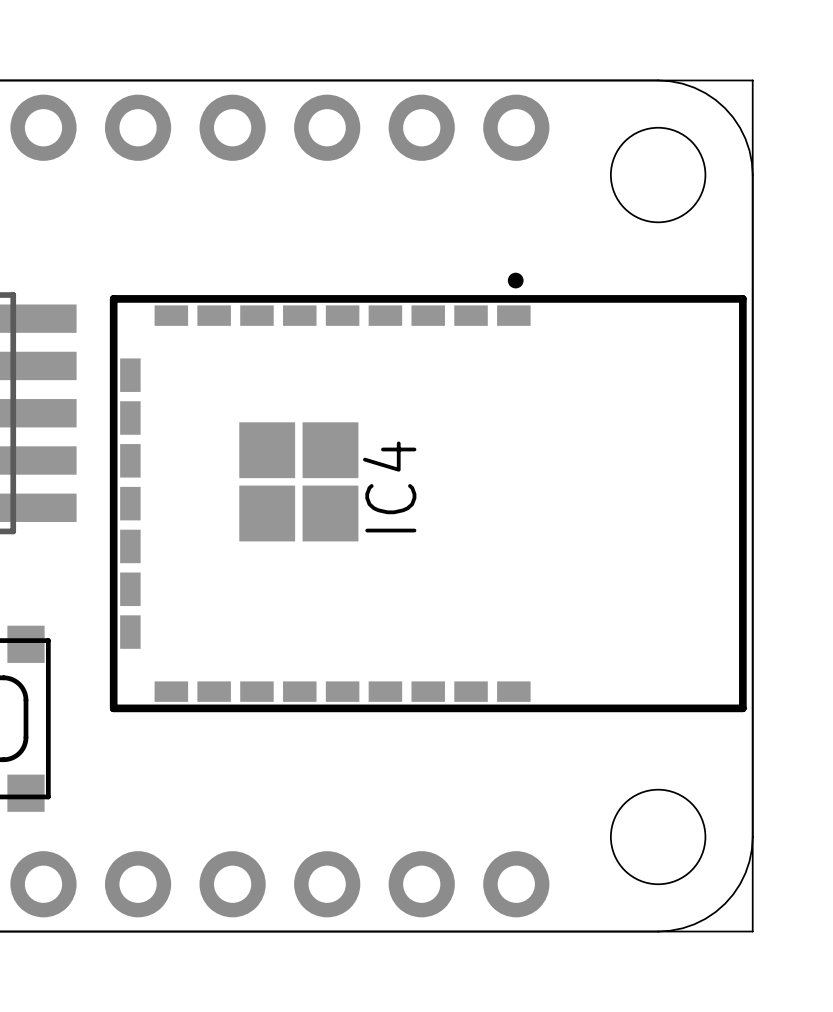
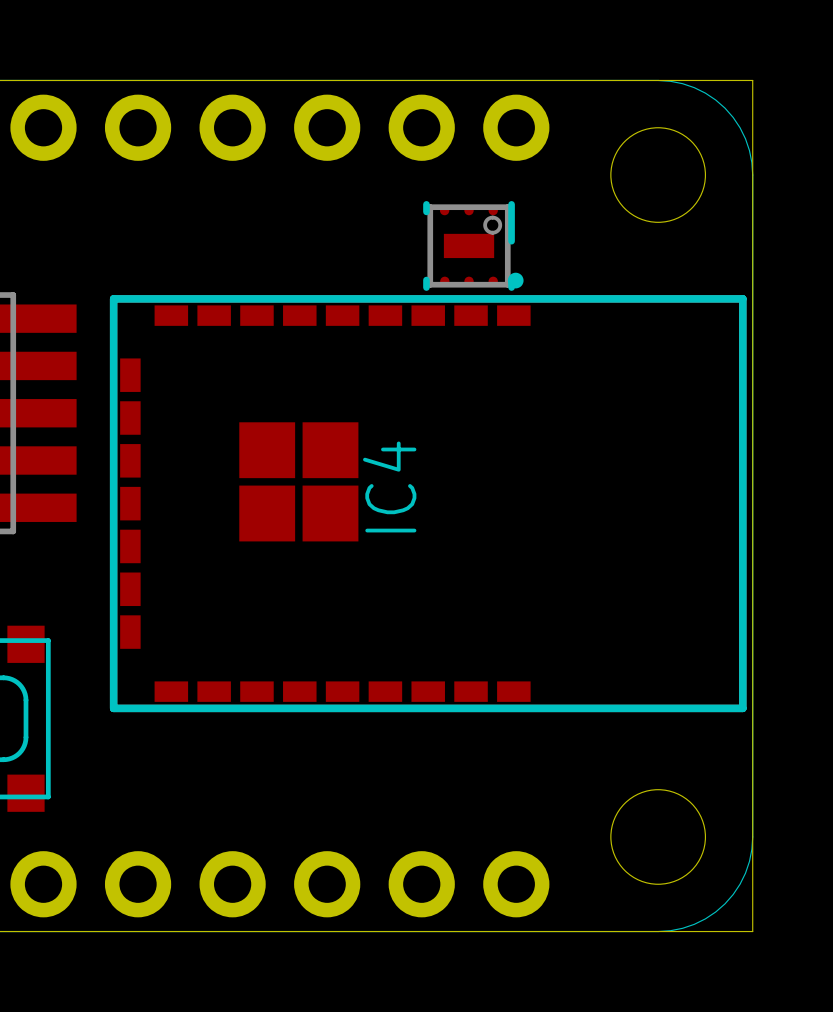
part: none -> (469, 245)

